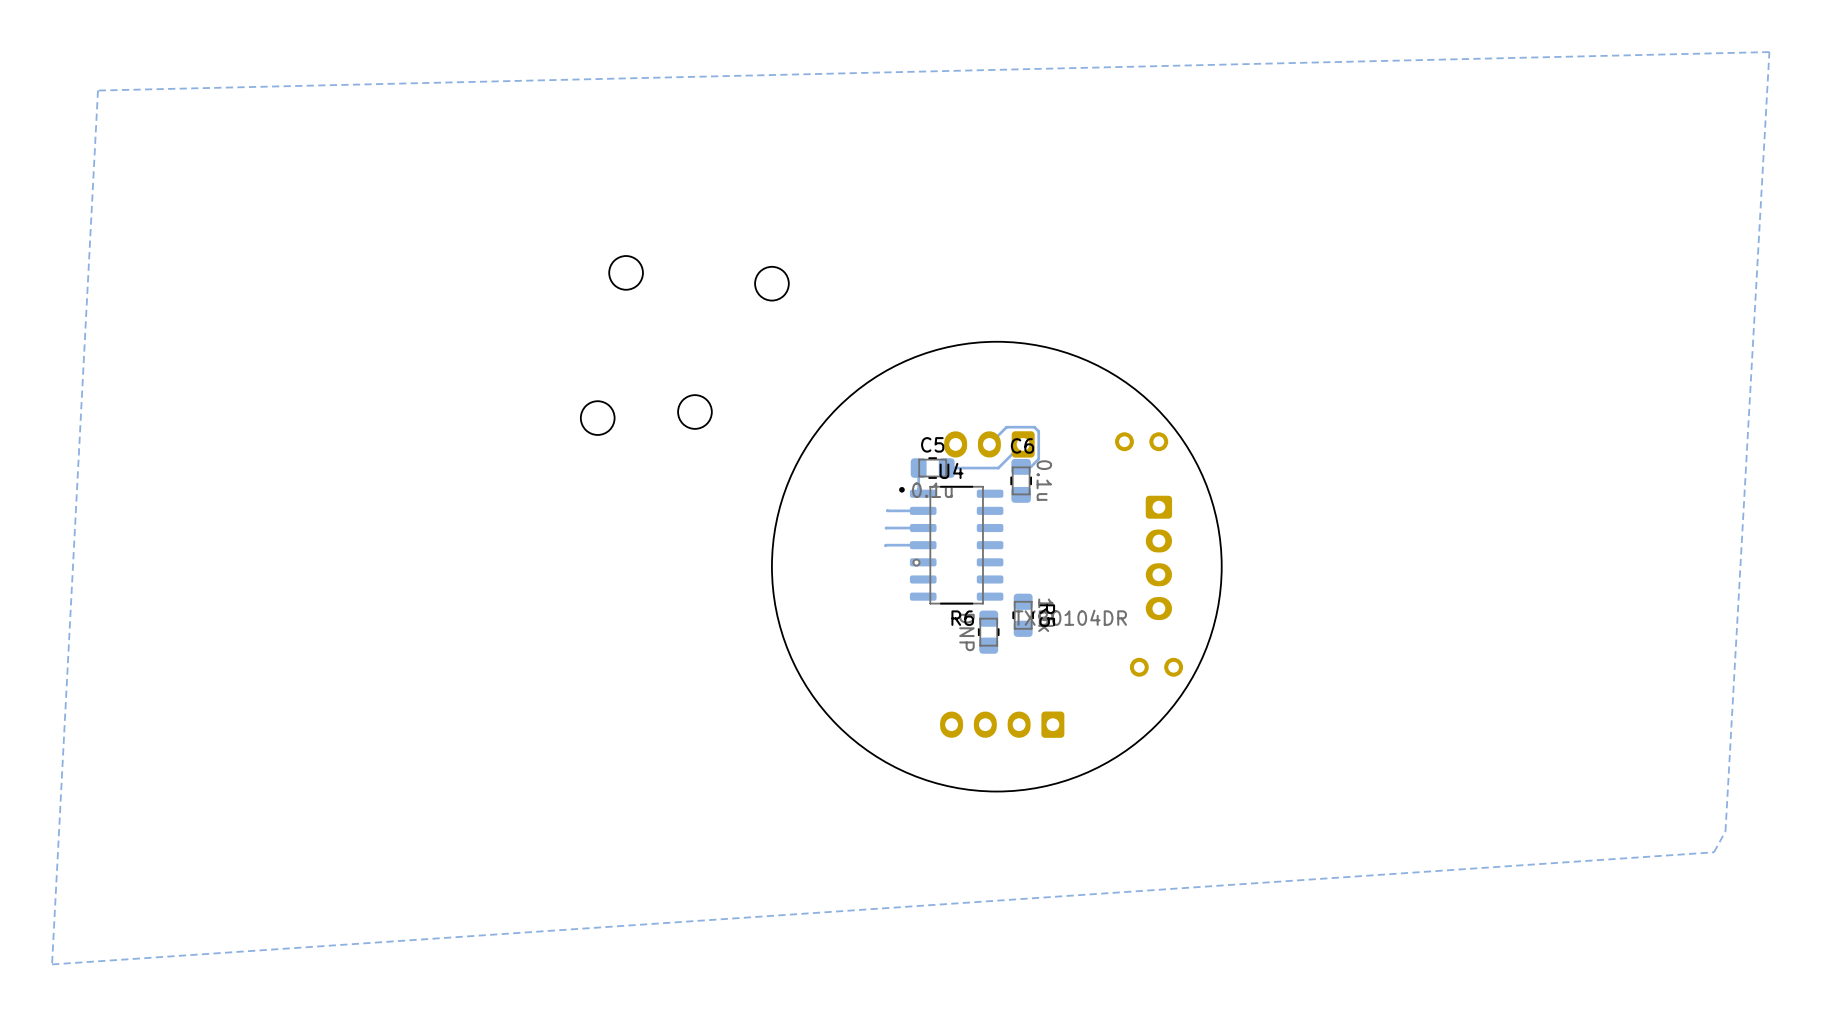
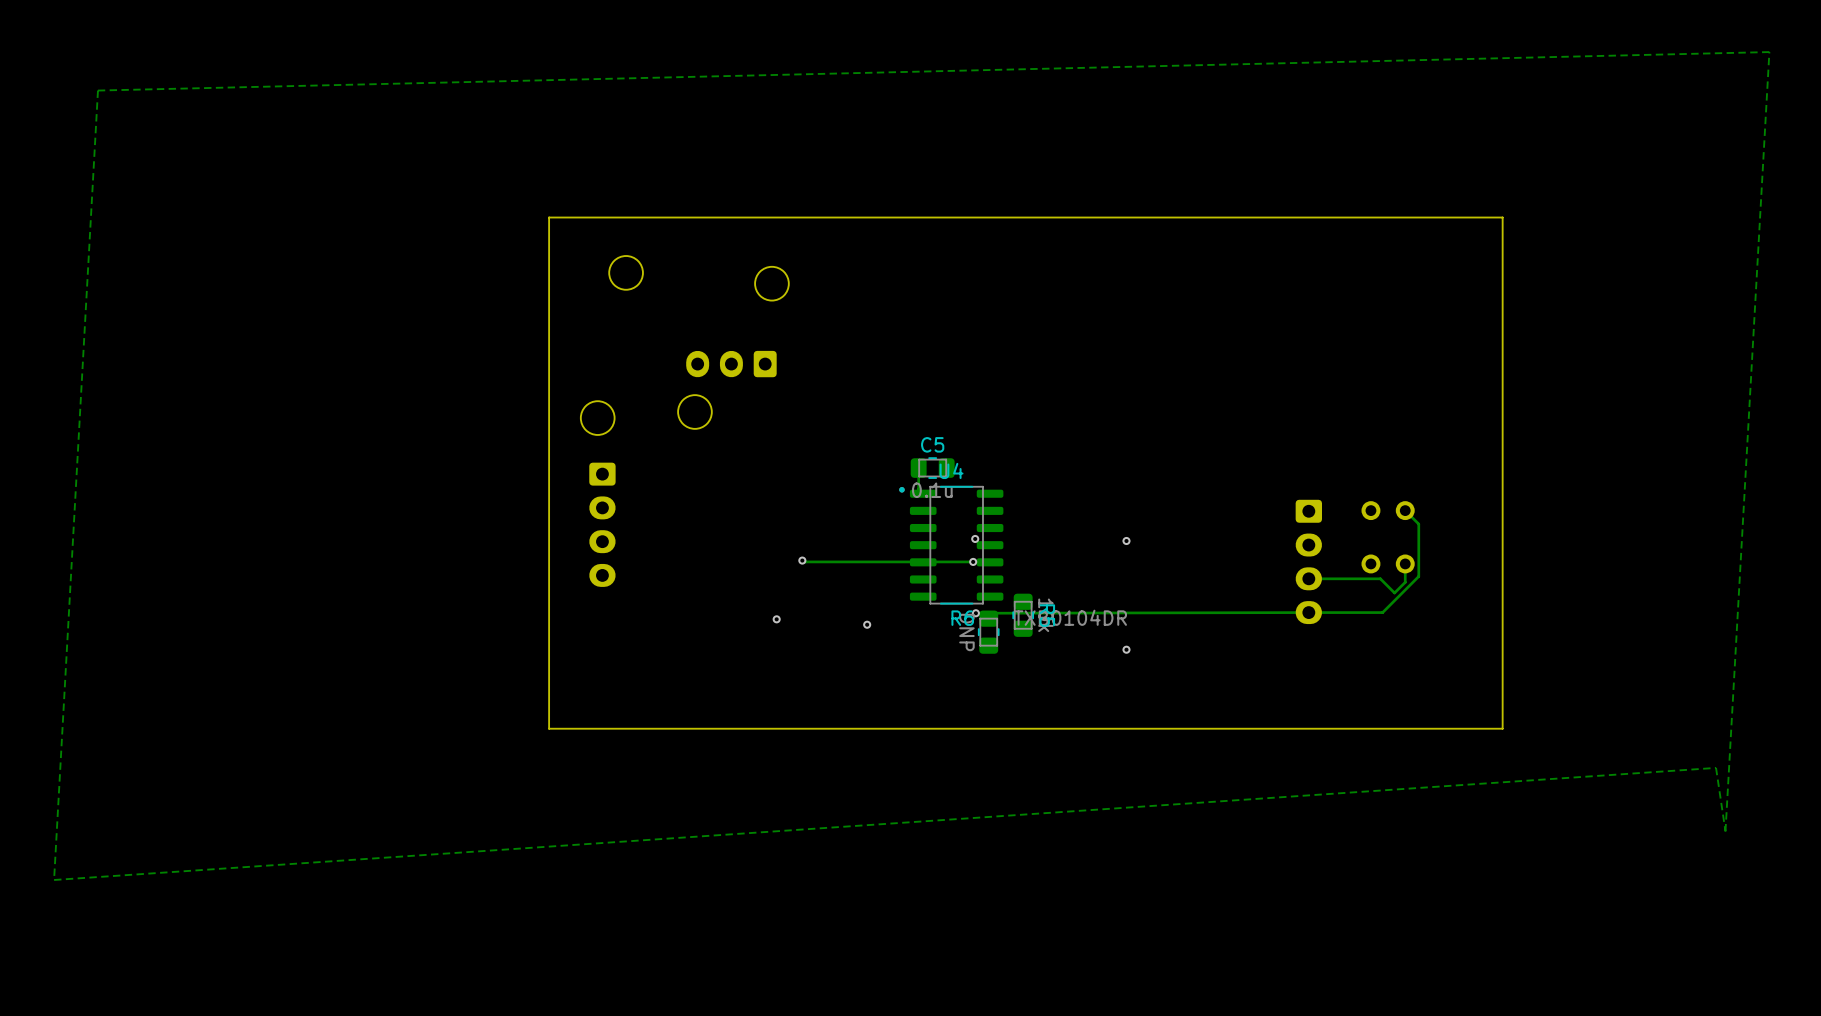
zone outline: (97, 90) (52, 964) (1714, 852) (1725, 831) -> (97, 90) (54, 880) (1716, 767) (1725, 831)
board edge: none -> (1502, 217) (549, 217) (549, 728) (1502, 728) (1502, 217)
round board edge: [771, 341, 1223, 792] -> none
part: (1141, 441) -> none
track: (989, 444) (1006, 427) (1034, 427) (1038, 431) (1038, 459) (1030, 466) (1021, 466) -> none
part position: (989, 444) -> (731, 364)
track: (1023, 444) (998, 468) (946, 468) -> none
C6: 0.1u (1021, 480) -> none
track: (887, 510) (923, 510) -> none
part: none -> (1388, 510)
track: none -> (1405, 510) (1418, 524) (1418, 576) (1382, 612) (976, 612)
part: none -> (602, 524)
track: (923, 528) (886, 528) -> none
via: none -> (975, 538)
via: none -> (1126, 540)
track: (923, 545) (885, 545) -> none
part position: (1158, 557) -> (1308, 561)
via: none -> (802, 560)
track: none -> (804, 560) (802, 560) (973, 561)
via: none -> (973, 561)
via: (916, 562) -> none
part: none -> (1388, 563)
track: none -> (1405, 563) (1405, 582) (1394, 592) (1380, 578) (1308, 578)
via: none -> (975, 613)
via: none -> (776, 619)
via: none -> (867, 624)
via: none -> (1126, 649)
part: (1156, 667) -> none
part: (1002, 724) -> none

